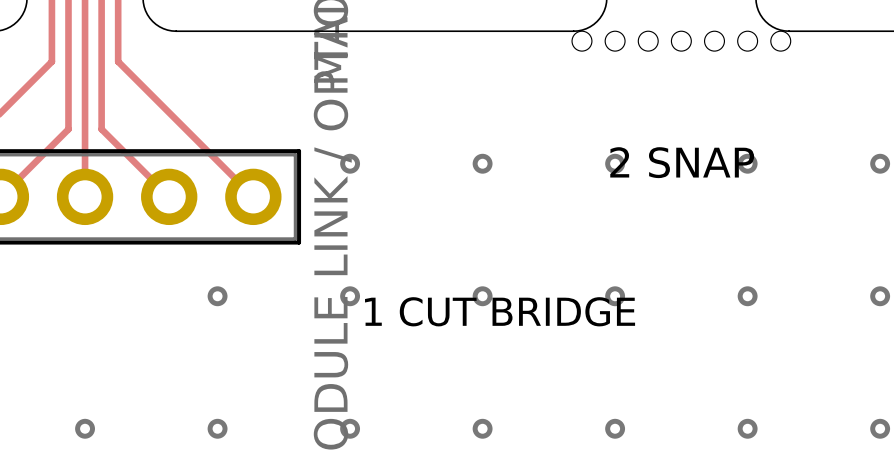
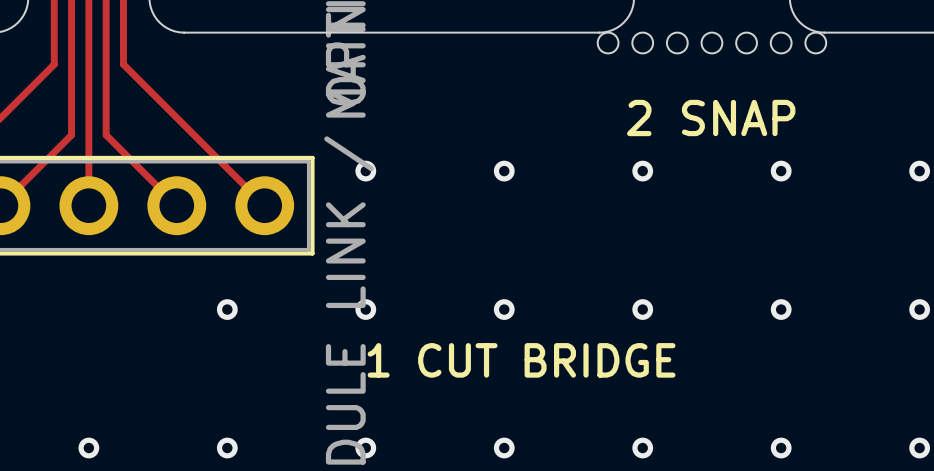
text position: 2 SNAP (682, 162) -> 2 SNAP (711, 118)
text position: 1 CUT BRIDGE (500, 311) -> 1 CUT BRIDGE (521, 360)

